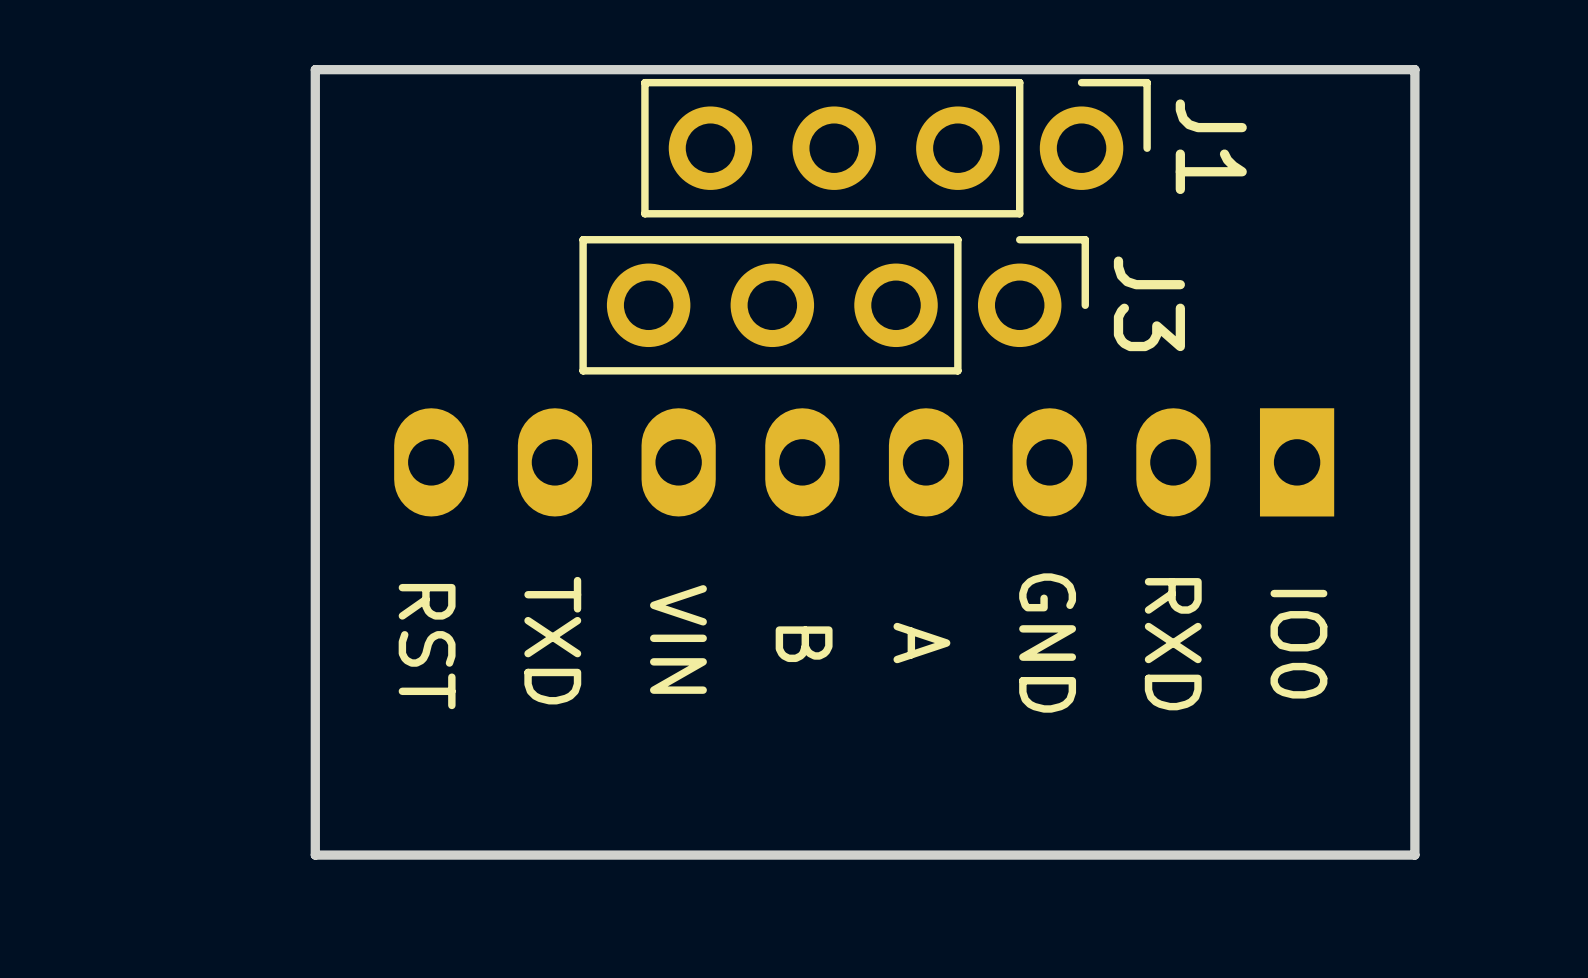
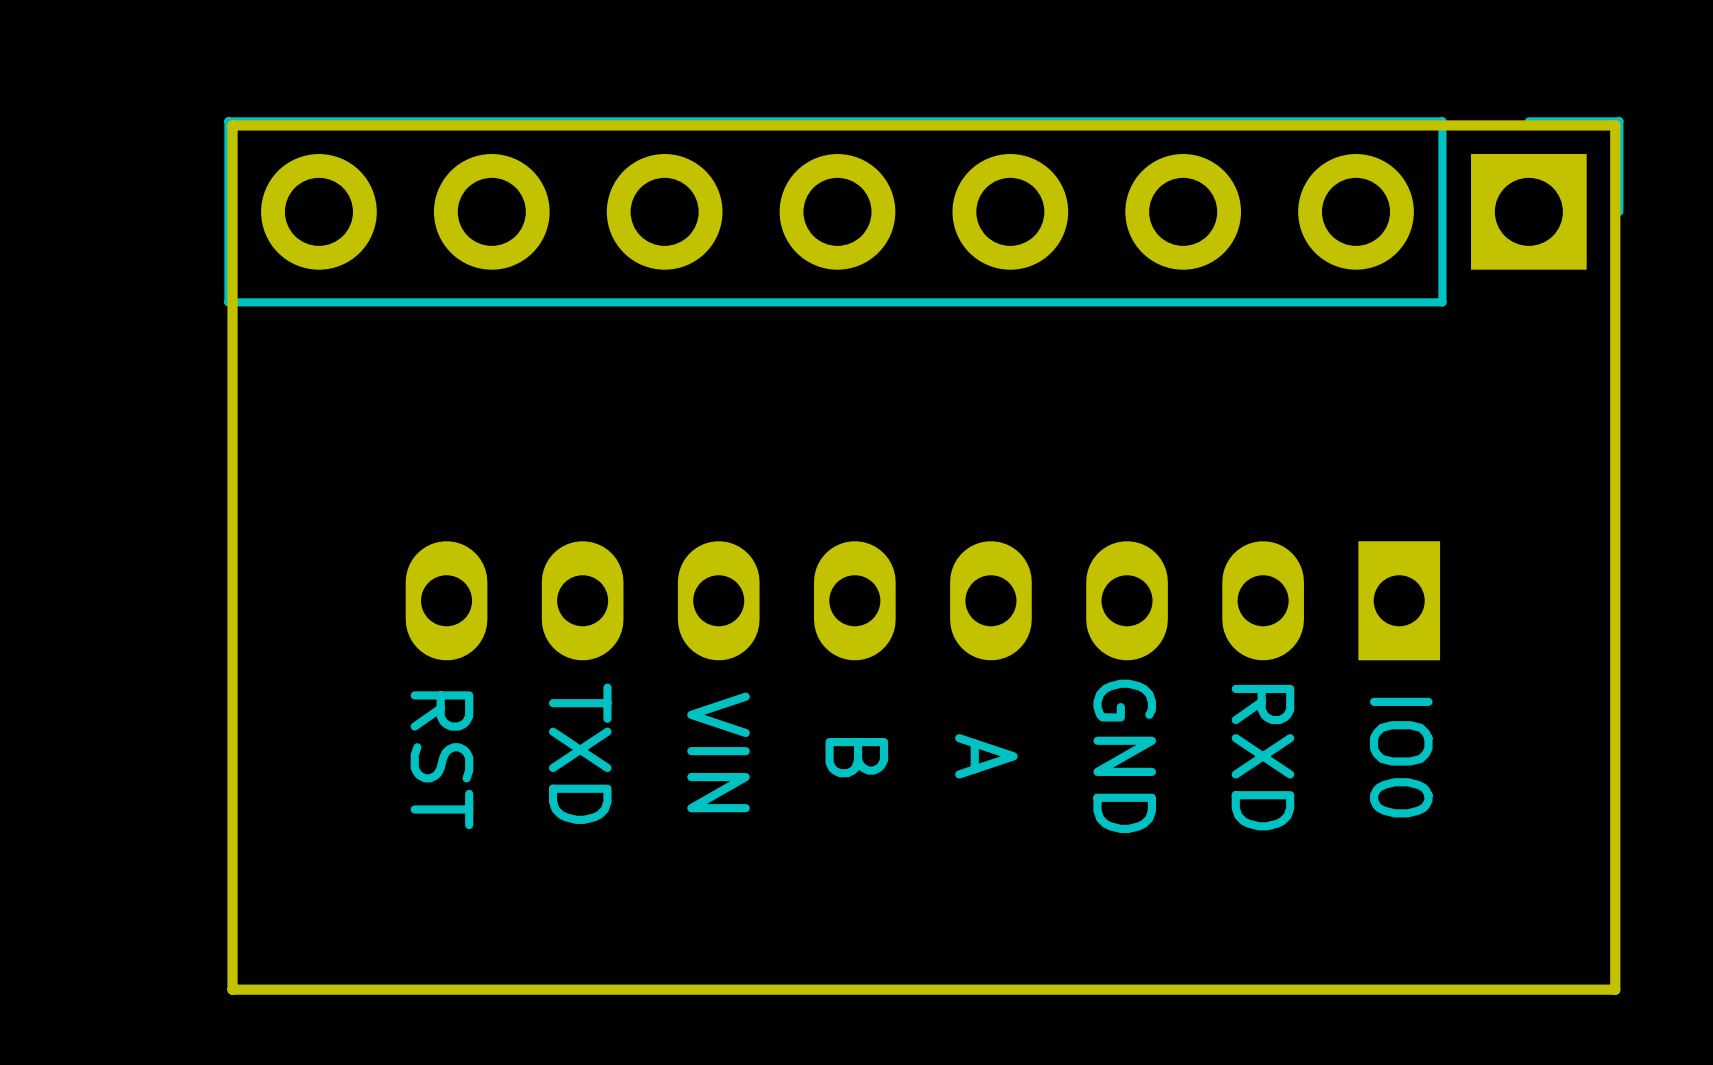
board edge: (315, 69) (315, 855) -> (318, 125) (232, 125) (232, 989) (318, 989)
board edge: (1414, 69) (1414, 855) -> (1528, 125) (1615, 125) (1615, 989) (1528, 989)
part: none -> (923, 211)
J1: (896, 148) -> none
J3: (834, 305) -> none
part position: (864, 462) -> (922, 600)

